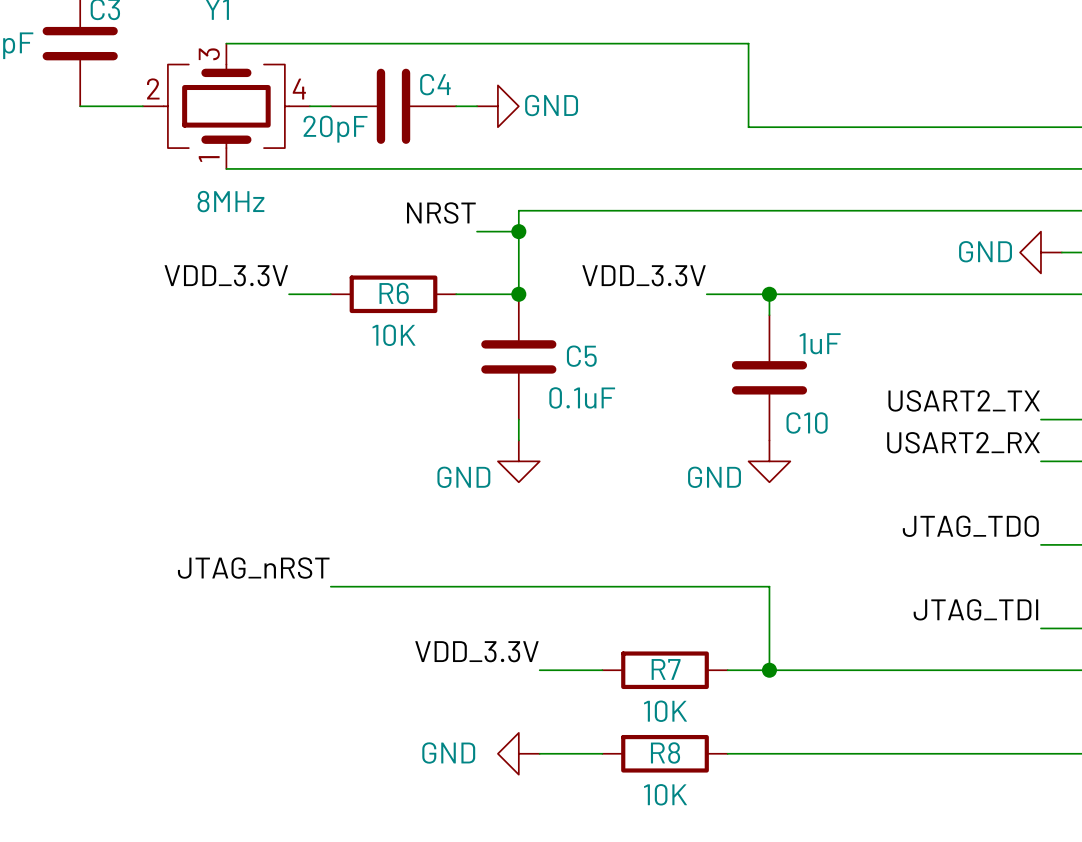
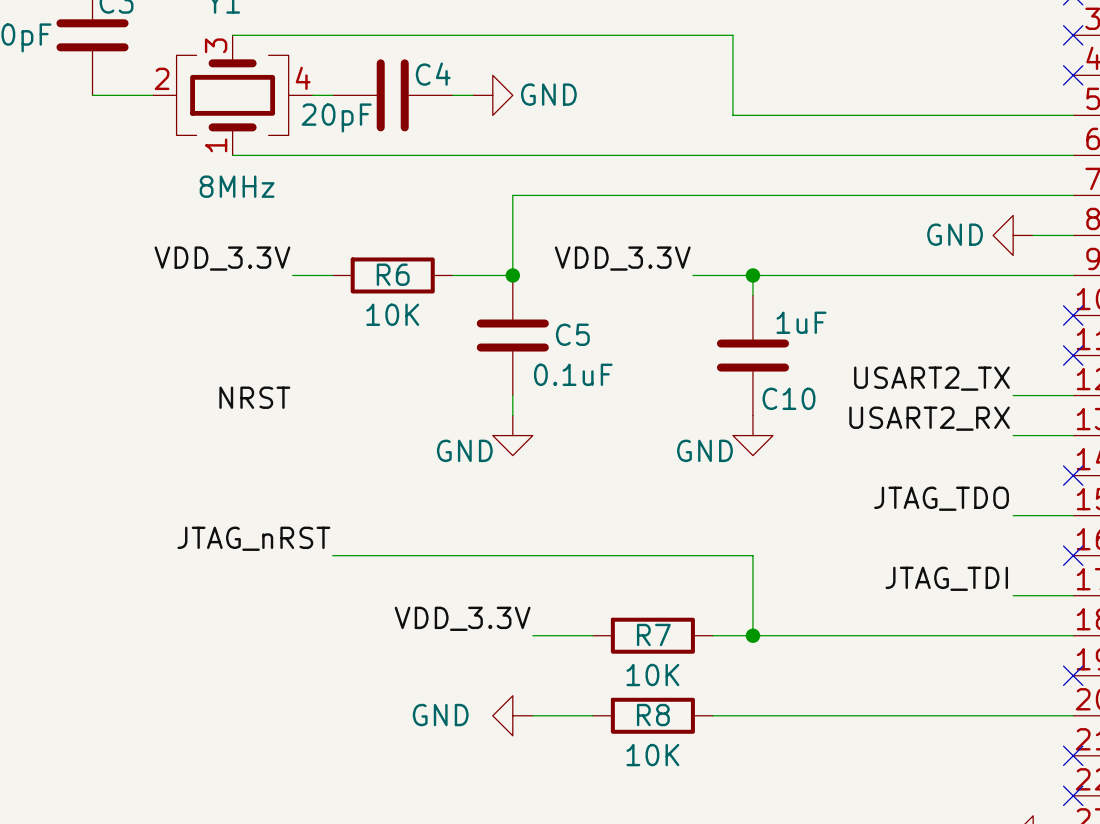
label position: NRST (441, 212) -> NRST (254, 397)
wire: (477, 231) (518, 231) -> none
junction: (518, 231) -> none

